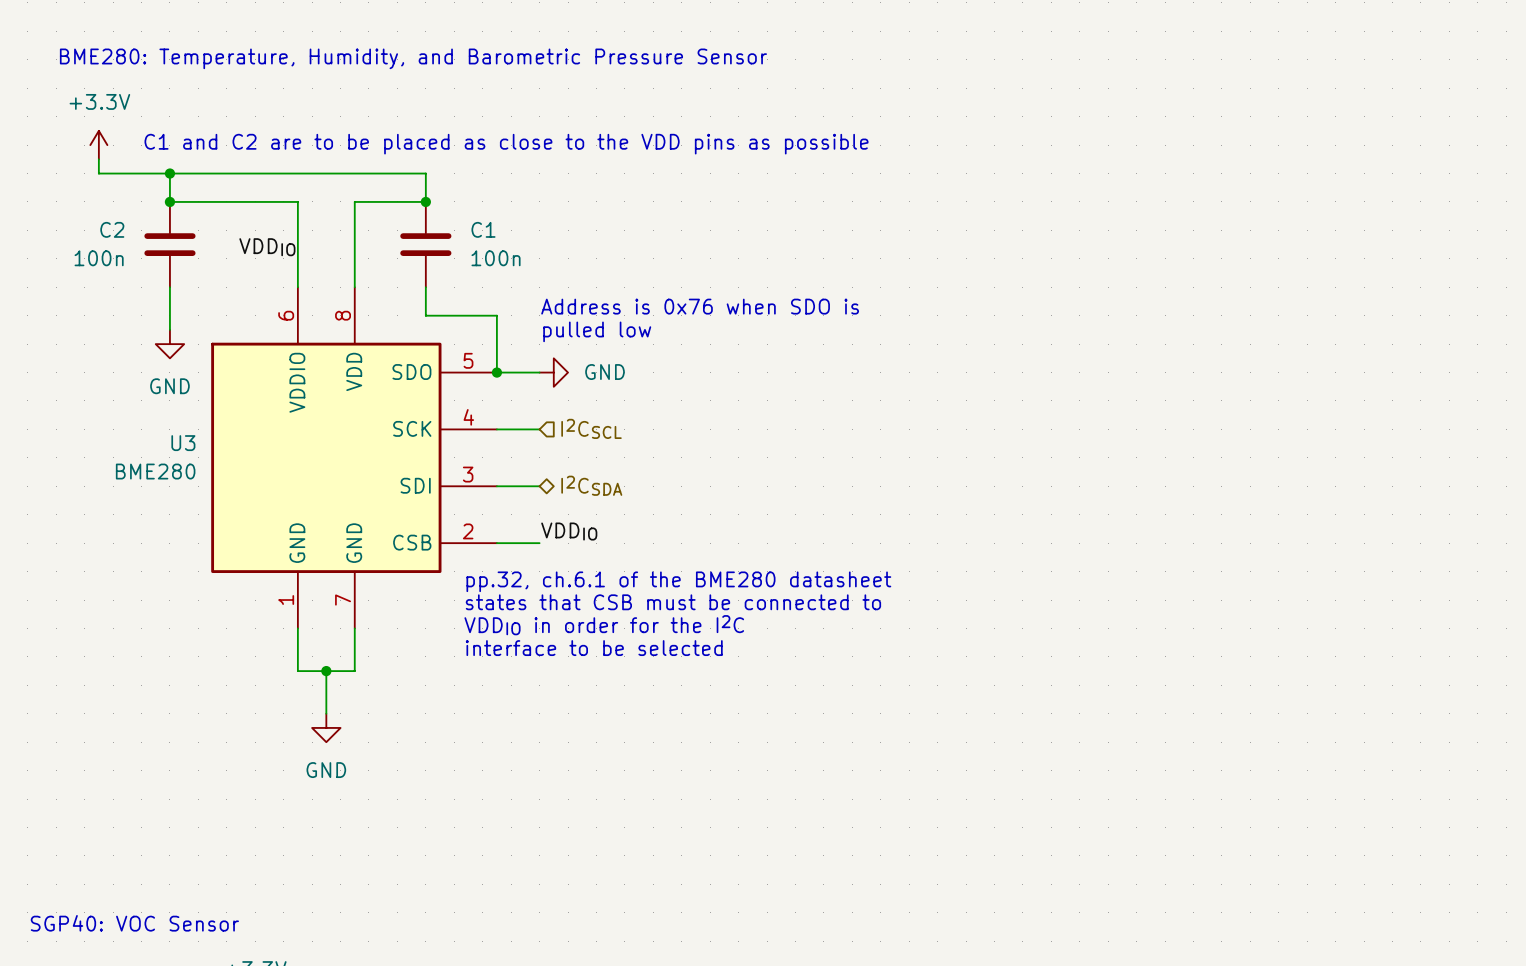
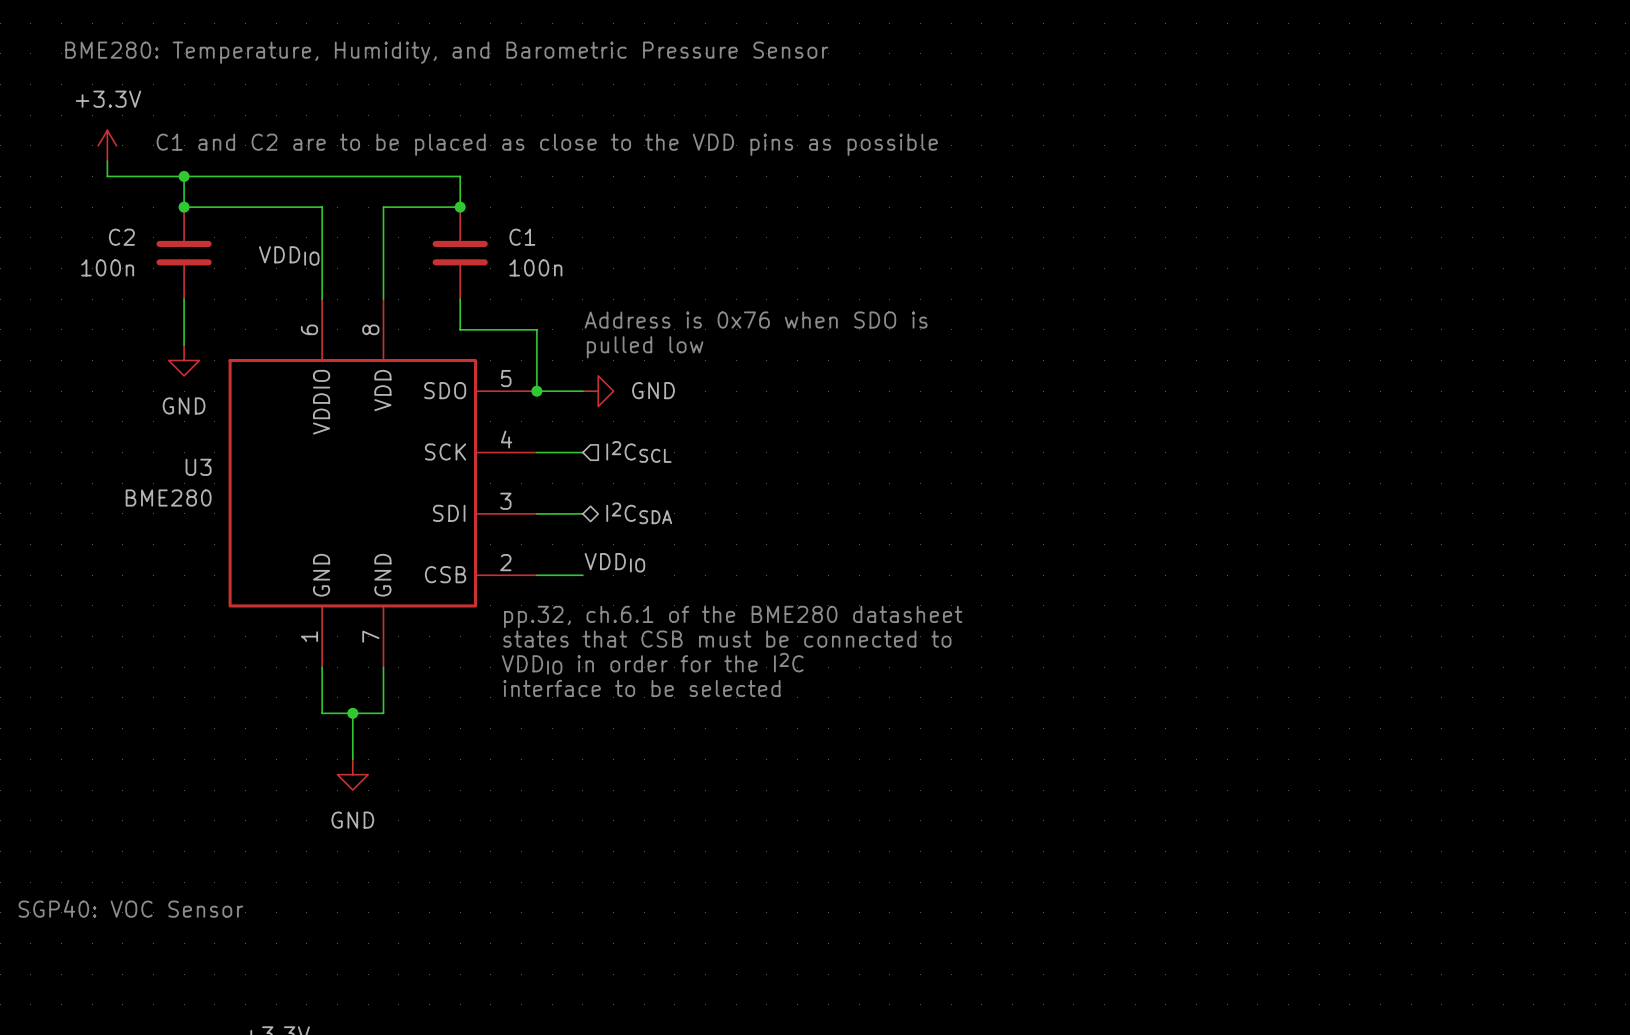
text position: SGP40: VOC Sensor (134, 923) -> SGP40: VOC Sensor (130, 908)

